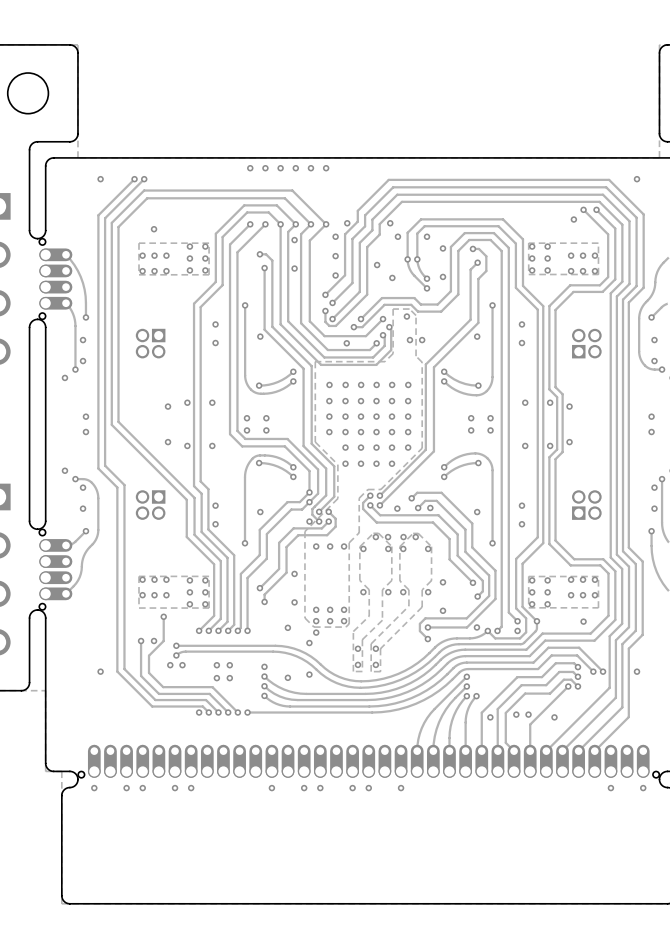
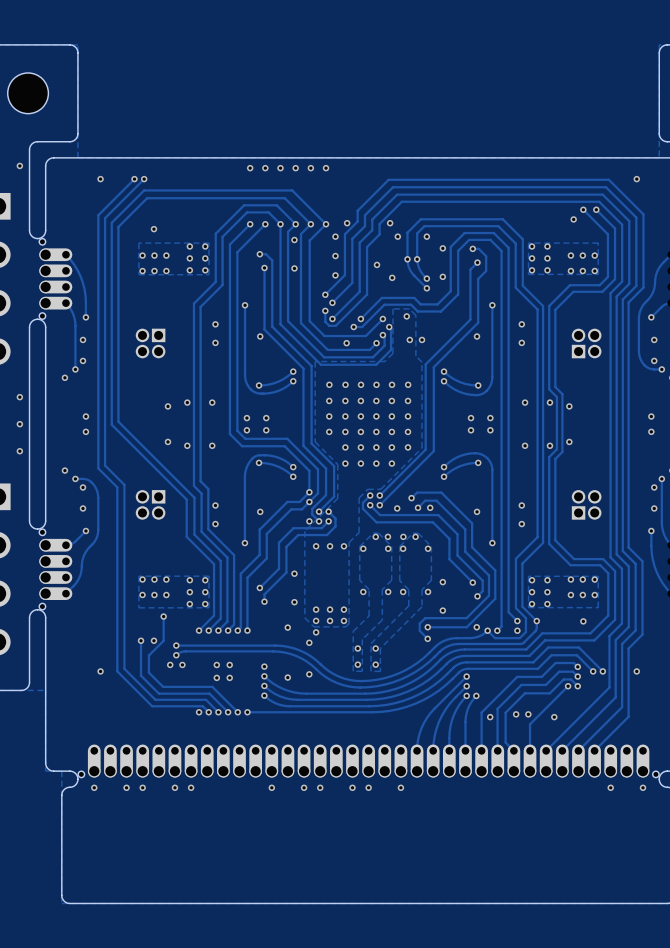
via: none -> (19, 165)
via: none -> (19, 397)
via: none -> (19, 424)
via: none -> (19, 451)

